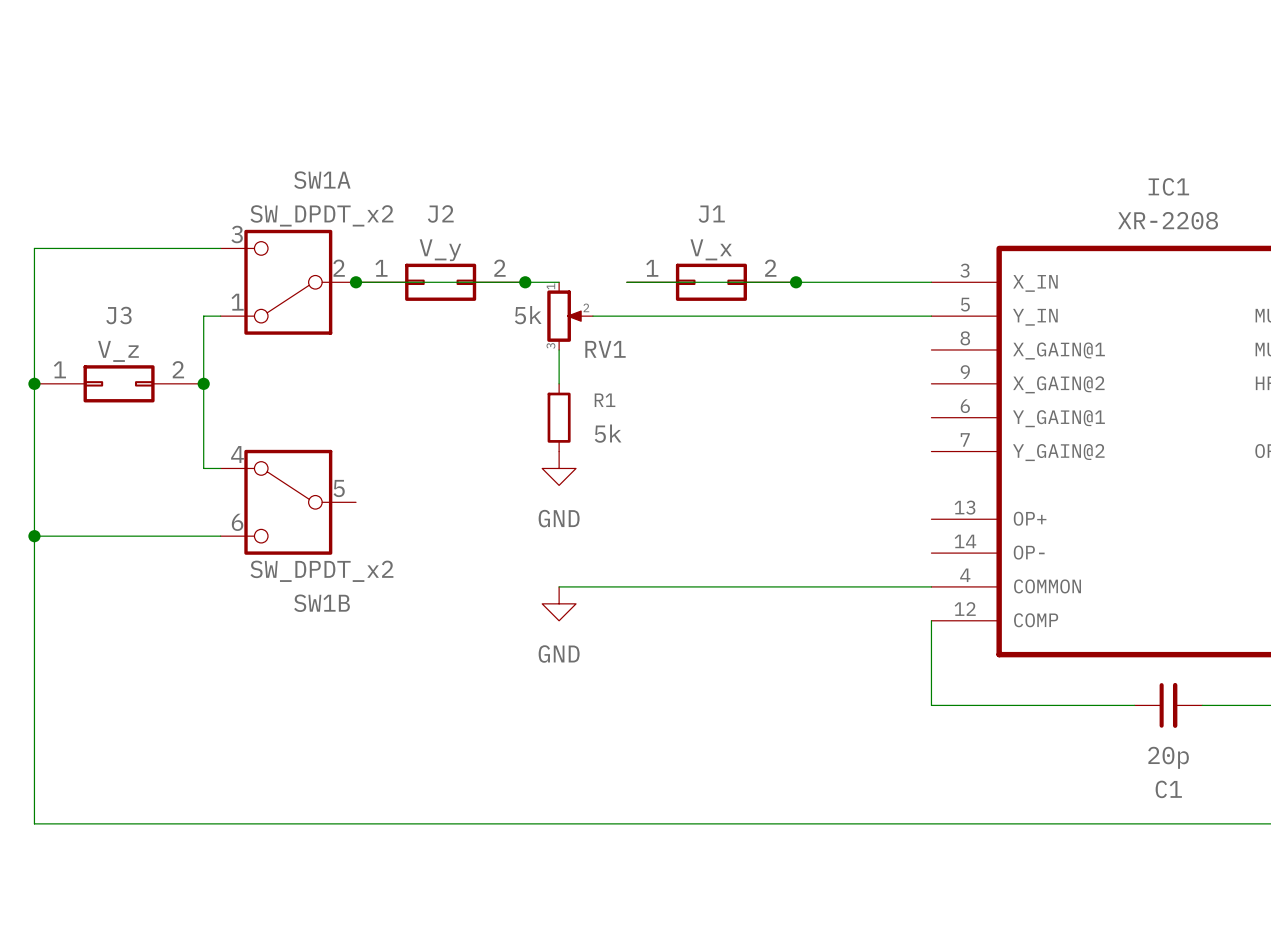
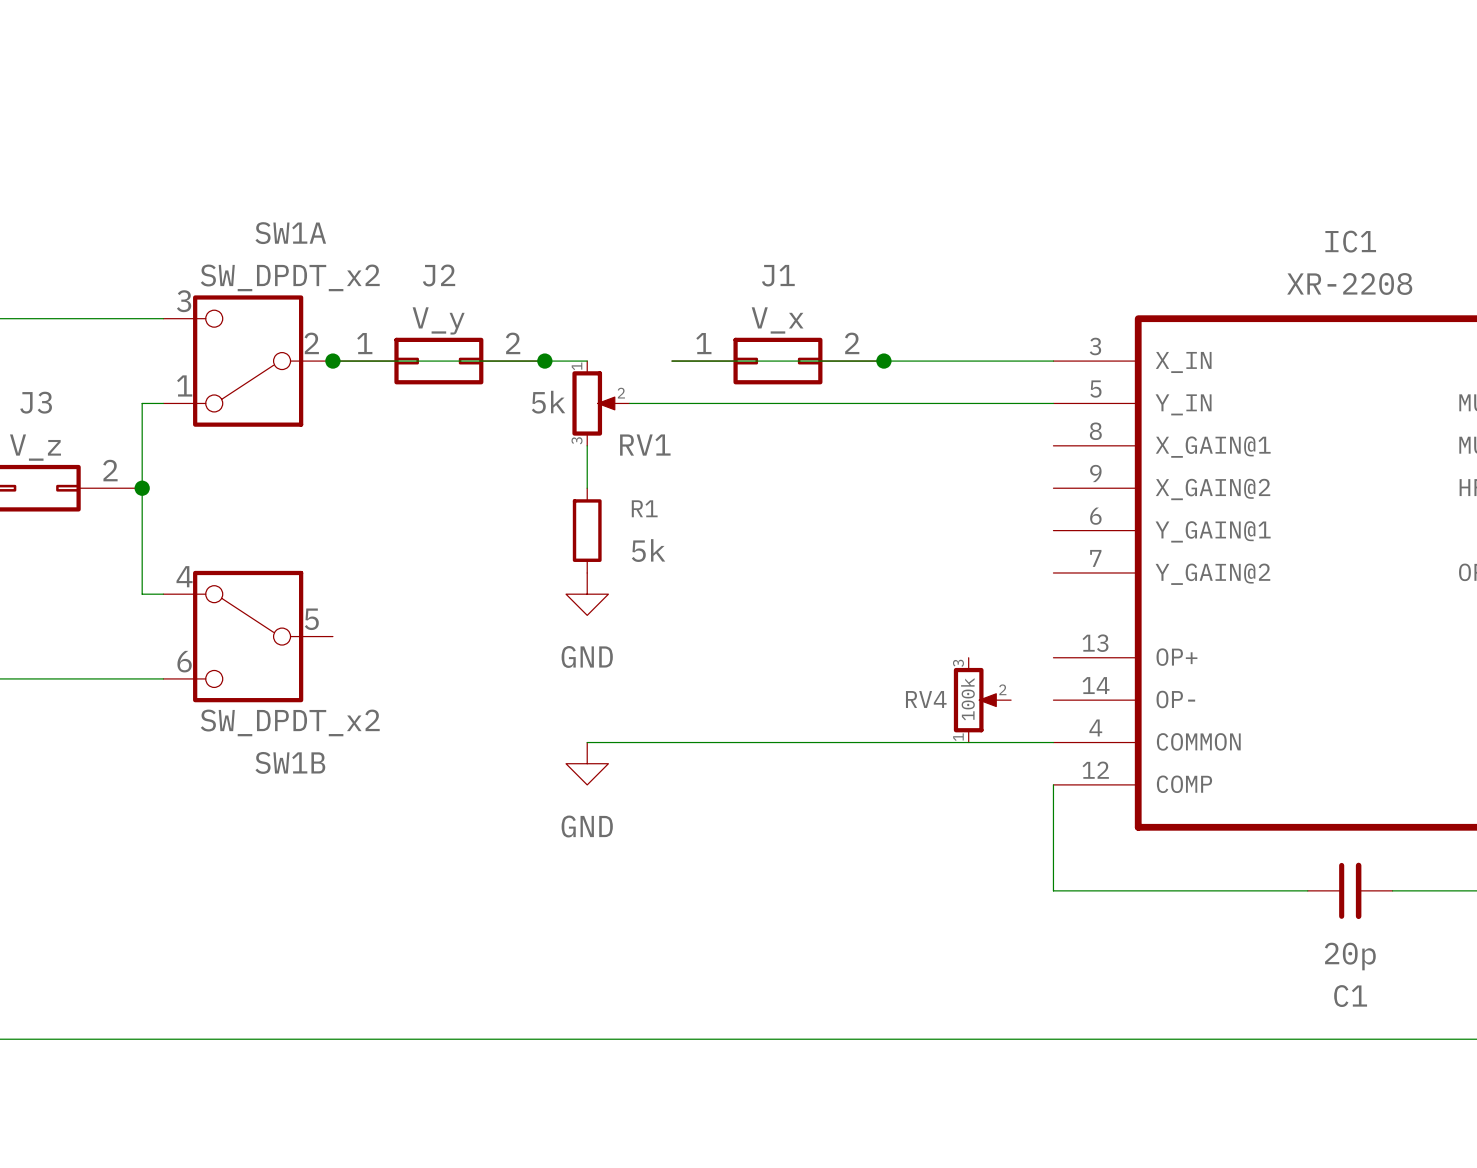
RV4: none -> 100k (982, 700)

